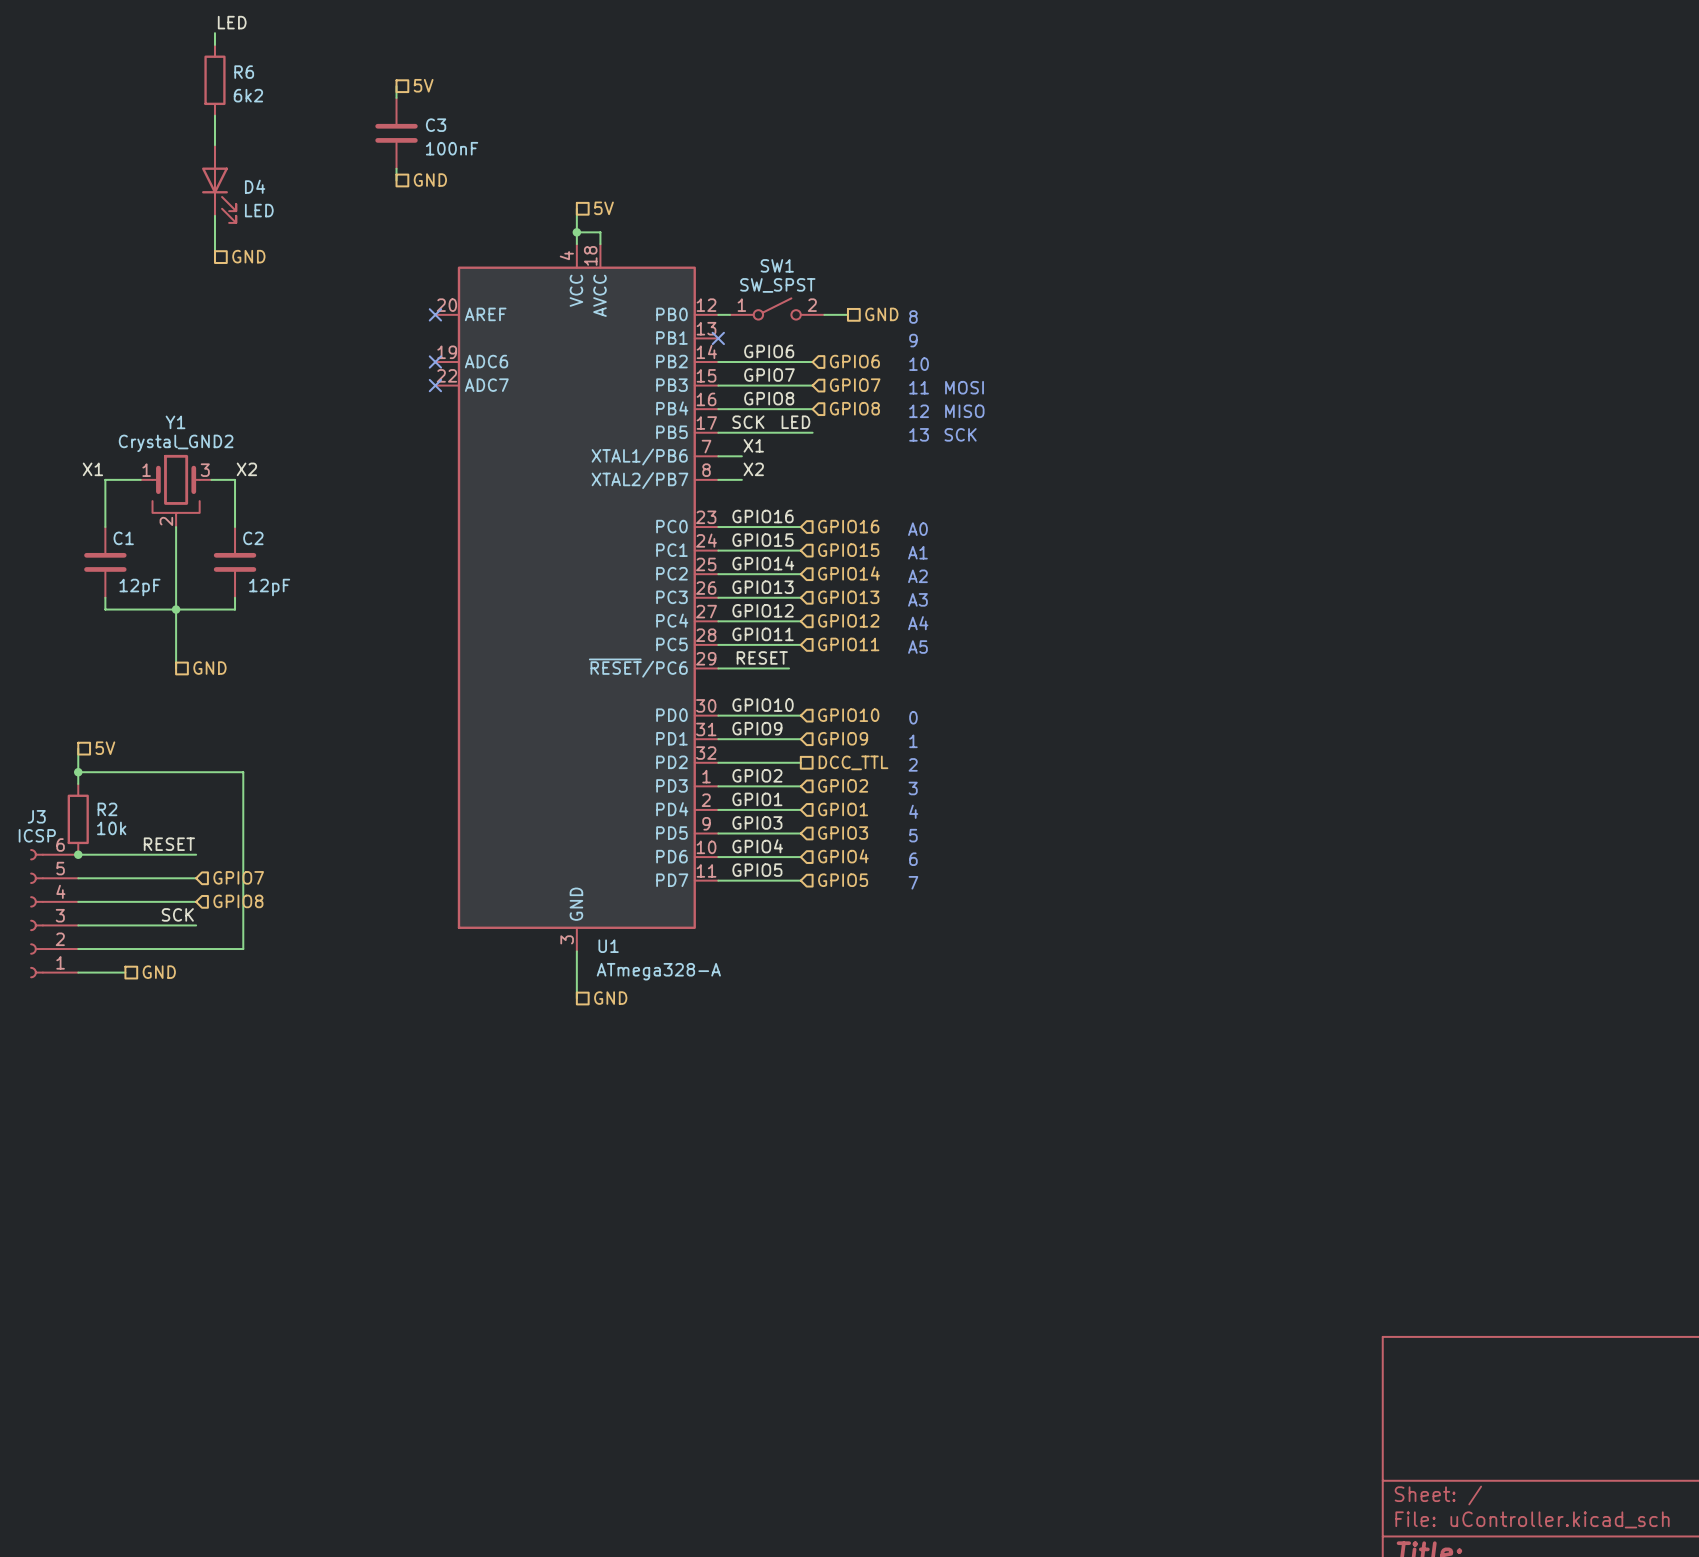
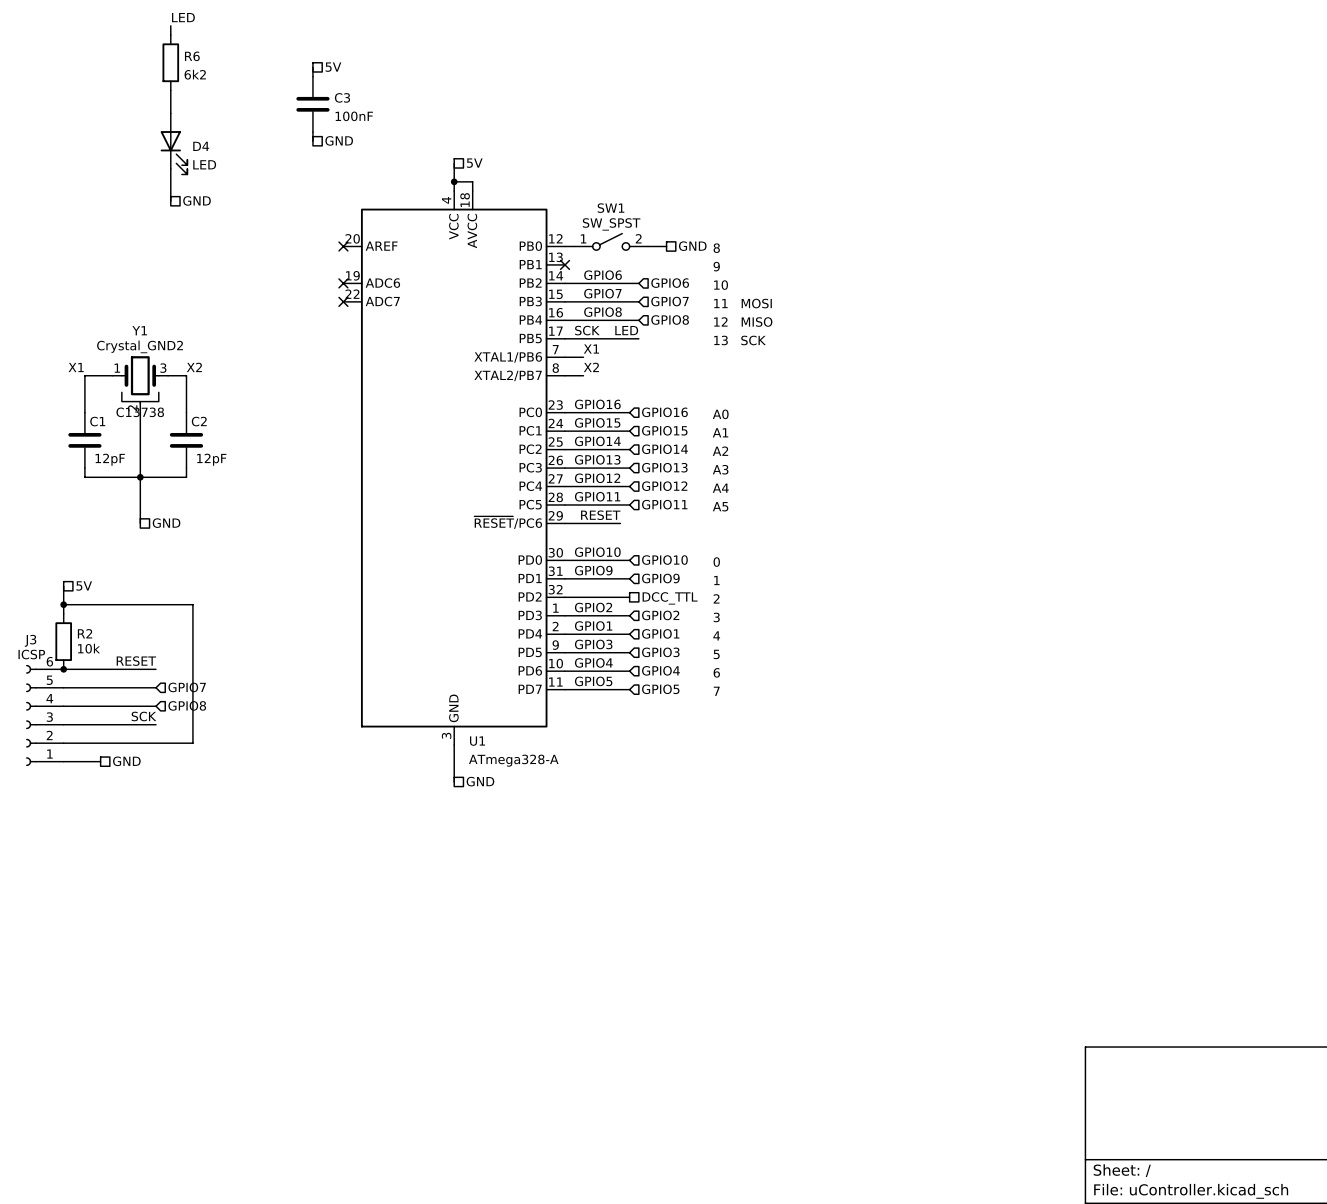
Y1 text: none -> C13738 (140, 412)

